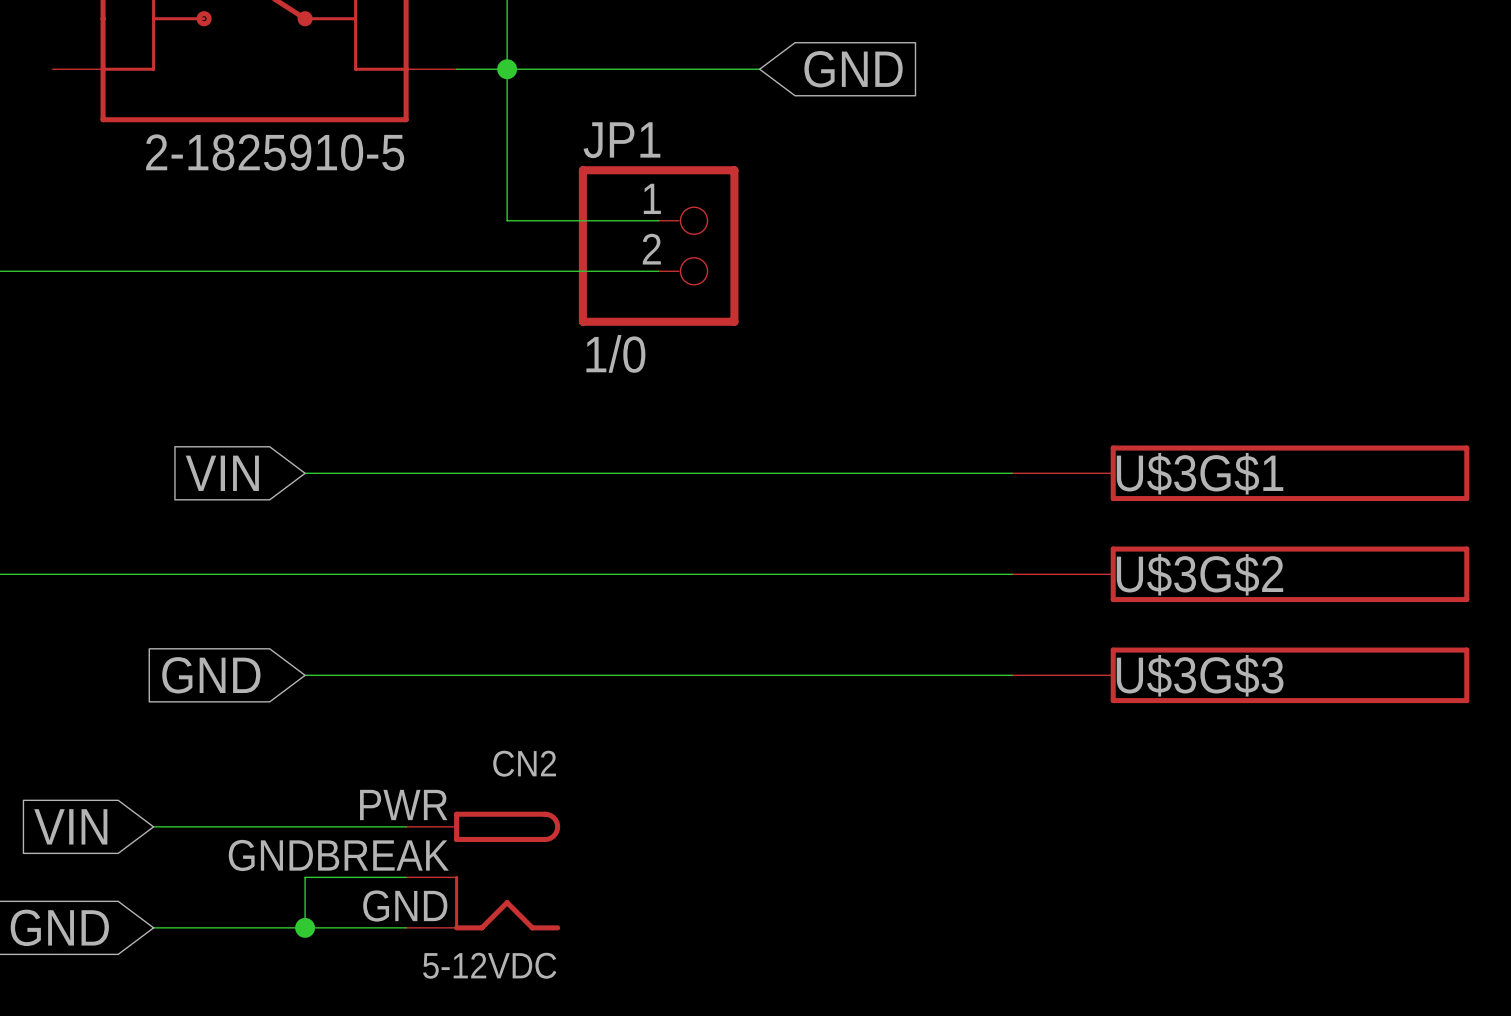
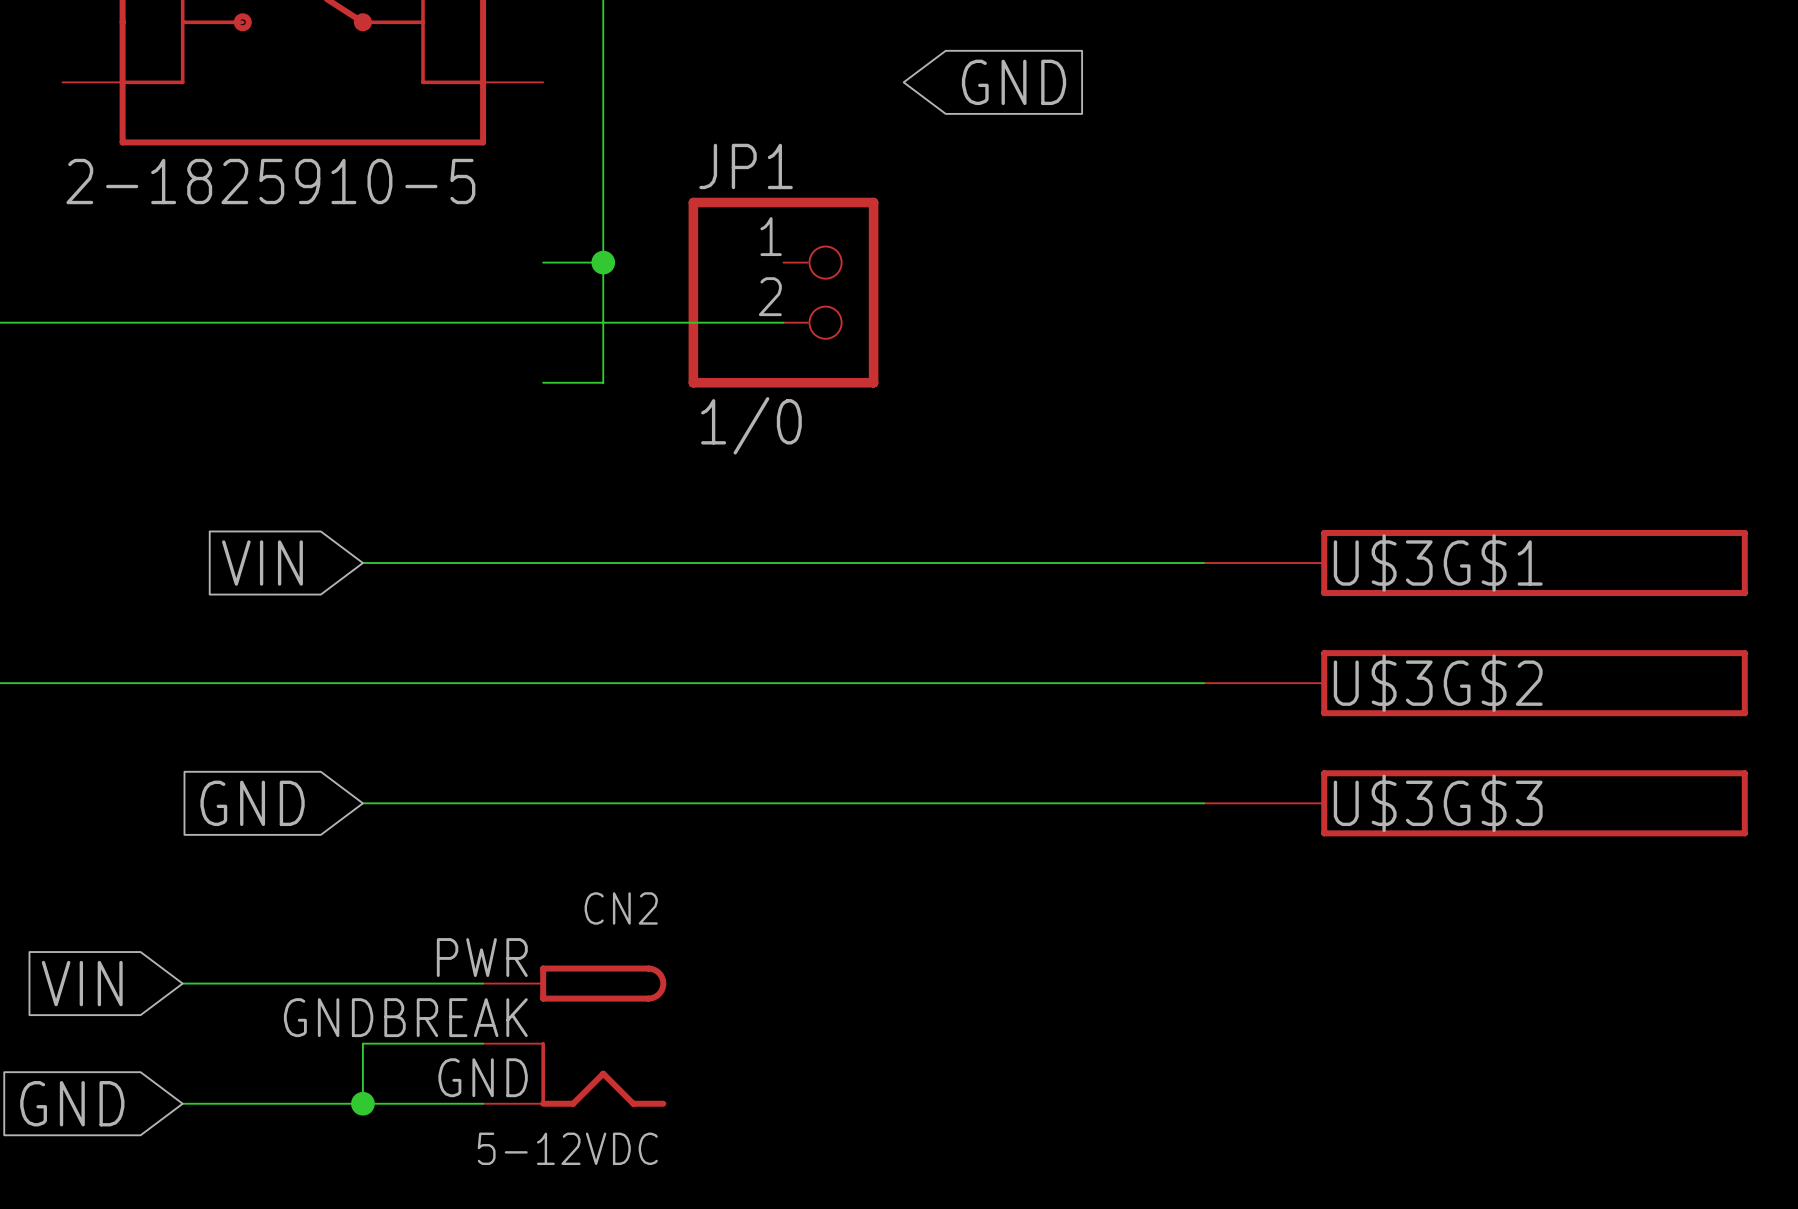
wire: (456, 69) (759, 69) -> none
junction: (507, 69) -> none
wire: none -> (543, 262) (603, 262) (603, 382) (543, 382)
wire: (507, 220) (658, 220) -> none
junction: none -> (603, 262)

